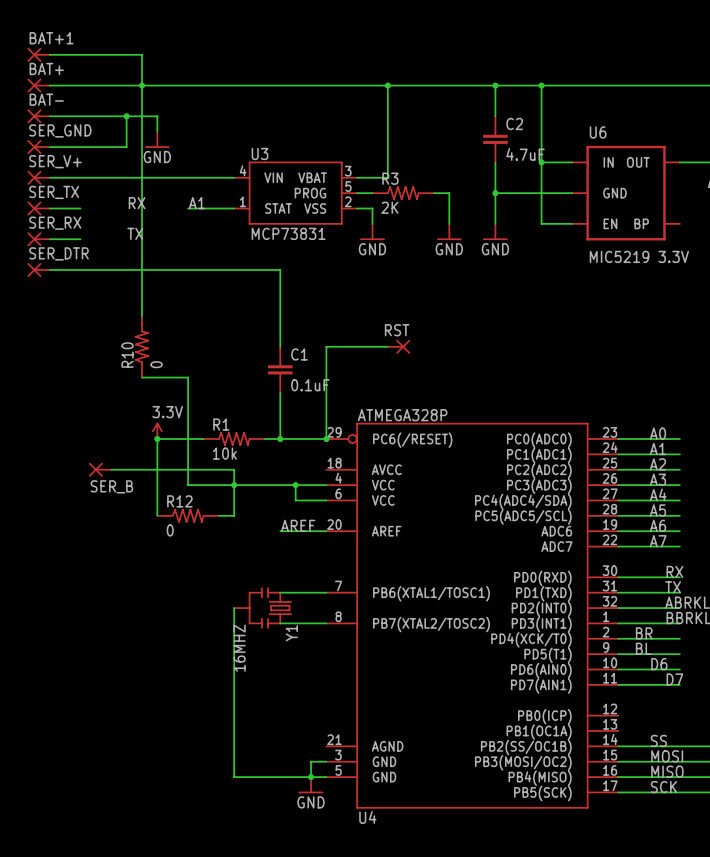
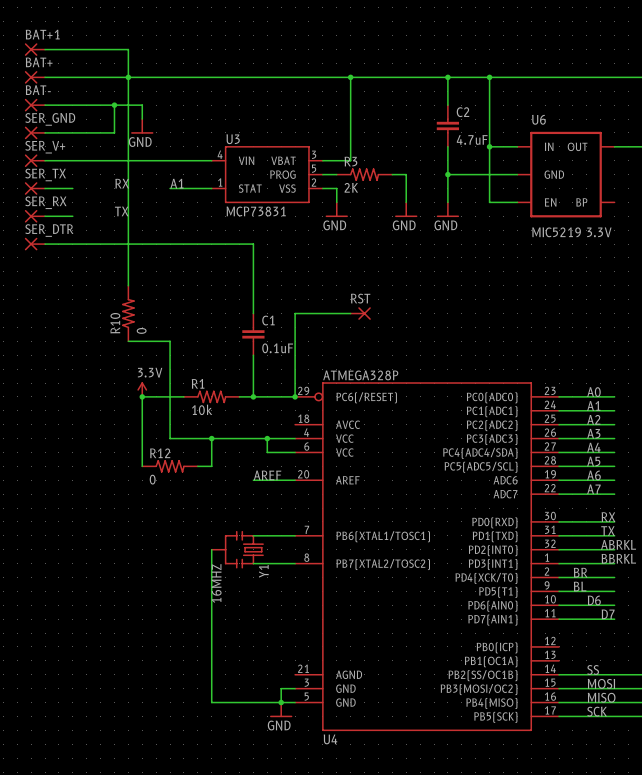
SER_B: (100, 469) -> none
wire: (111, 469) (234, 469) (234, 485) -> none

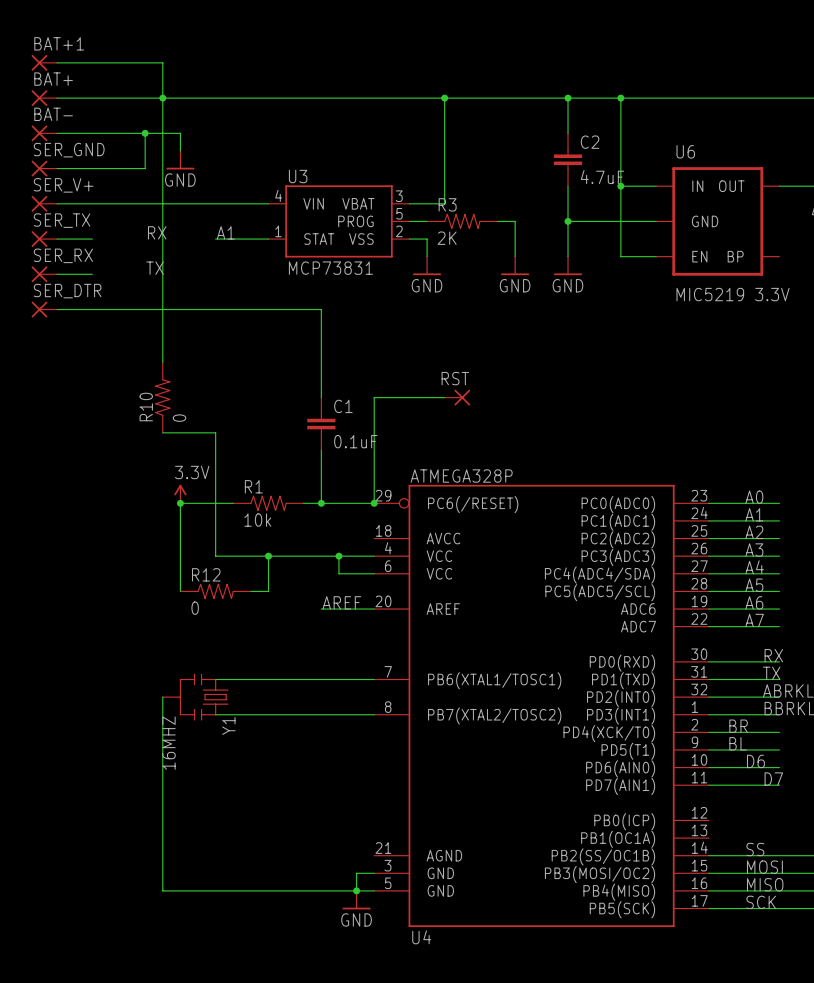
wire: none -> (215, 679) (321, 679)
wire: (211, 549) (211, 702) -> (162, 697) (162, 890) (268, 890)
Y1 position: (237, 549) -> (195, 697)
wire: none -> (215, 714) (321, 714)

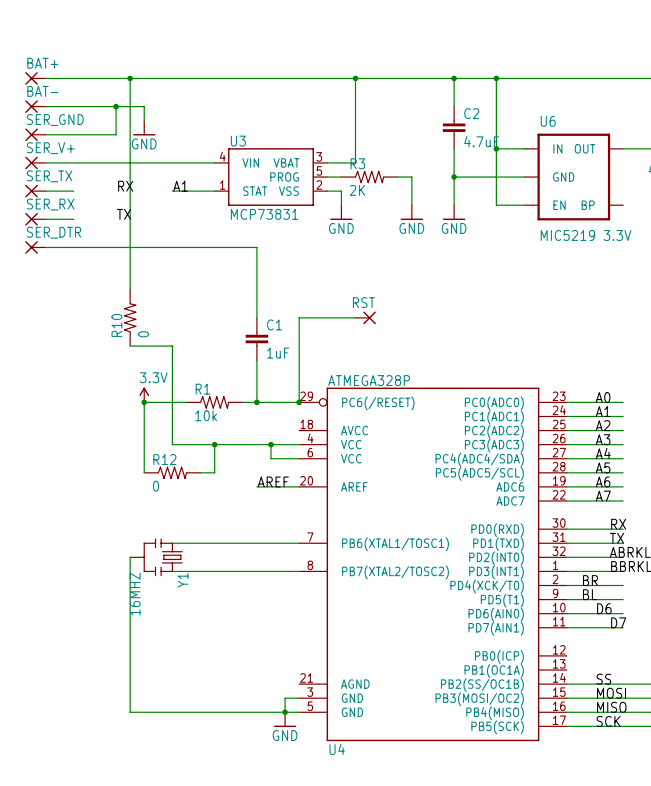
BAT+1: (44, 62) -> none
wire: (57, 62) (162, 62) (162, 98) -> none
C1 value: 0.1uF (355, 441) -> 1uF (278, 353)

